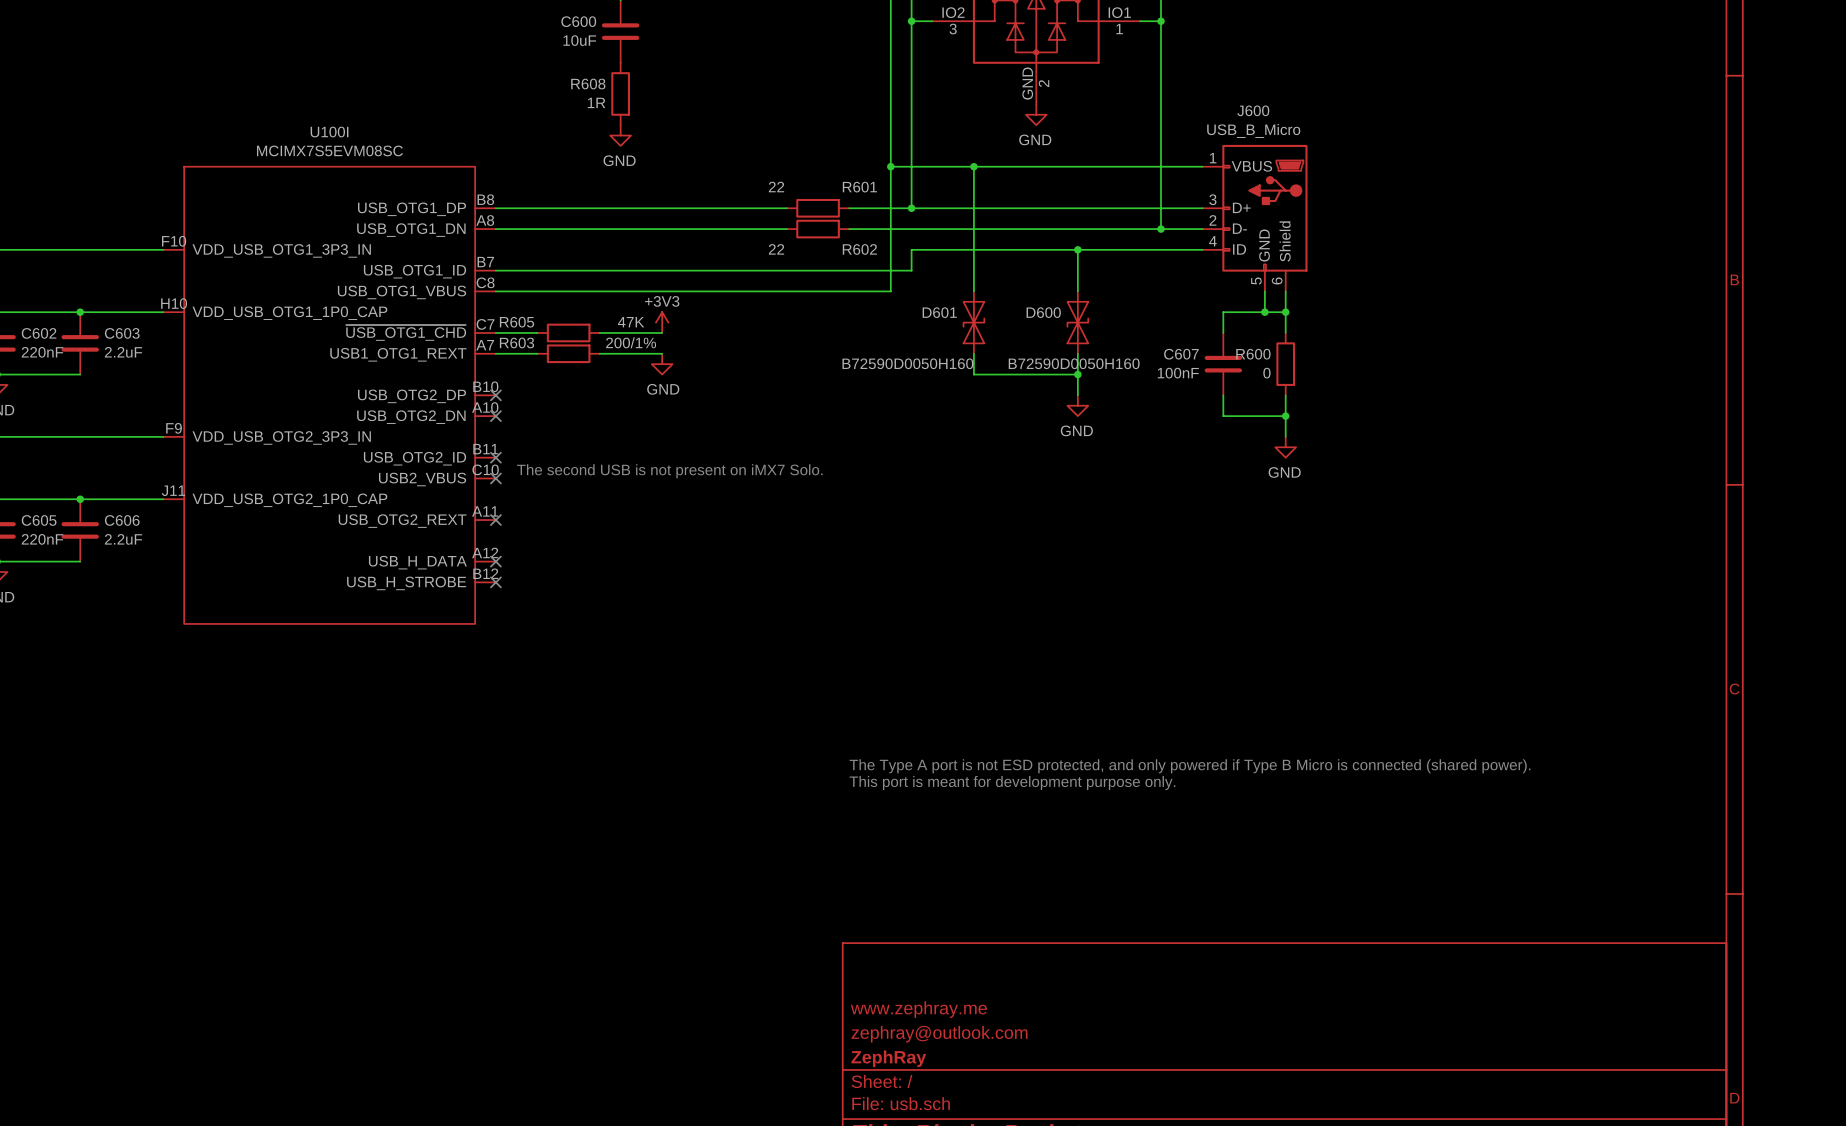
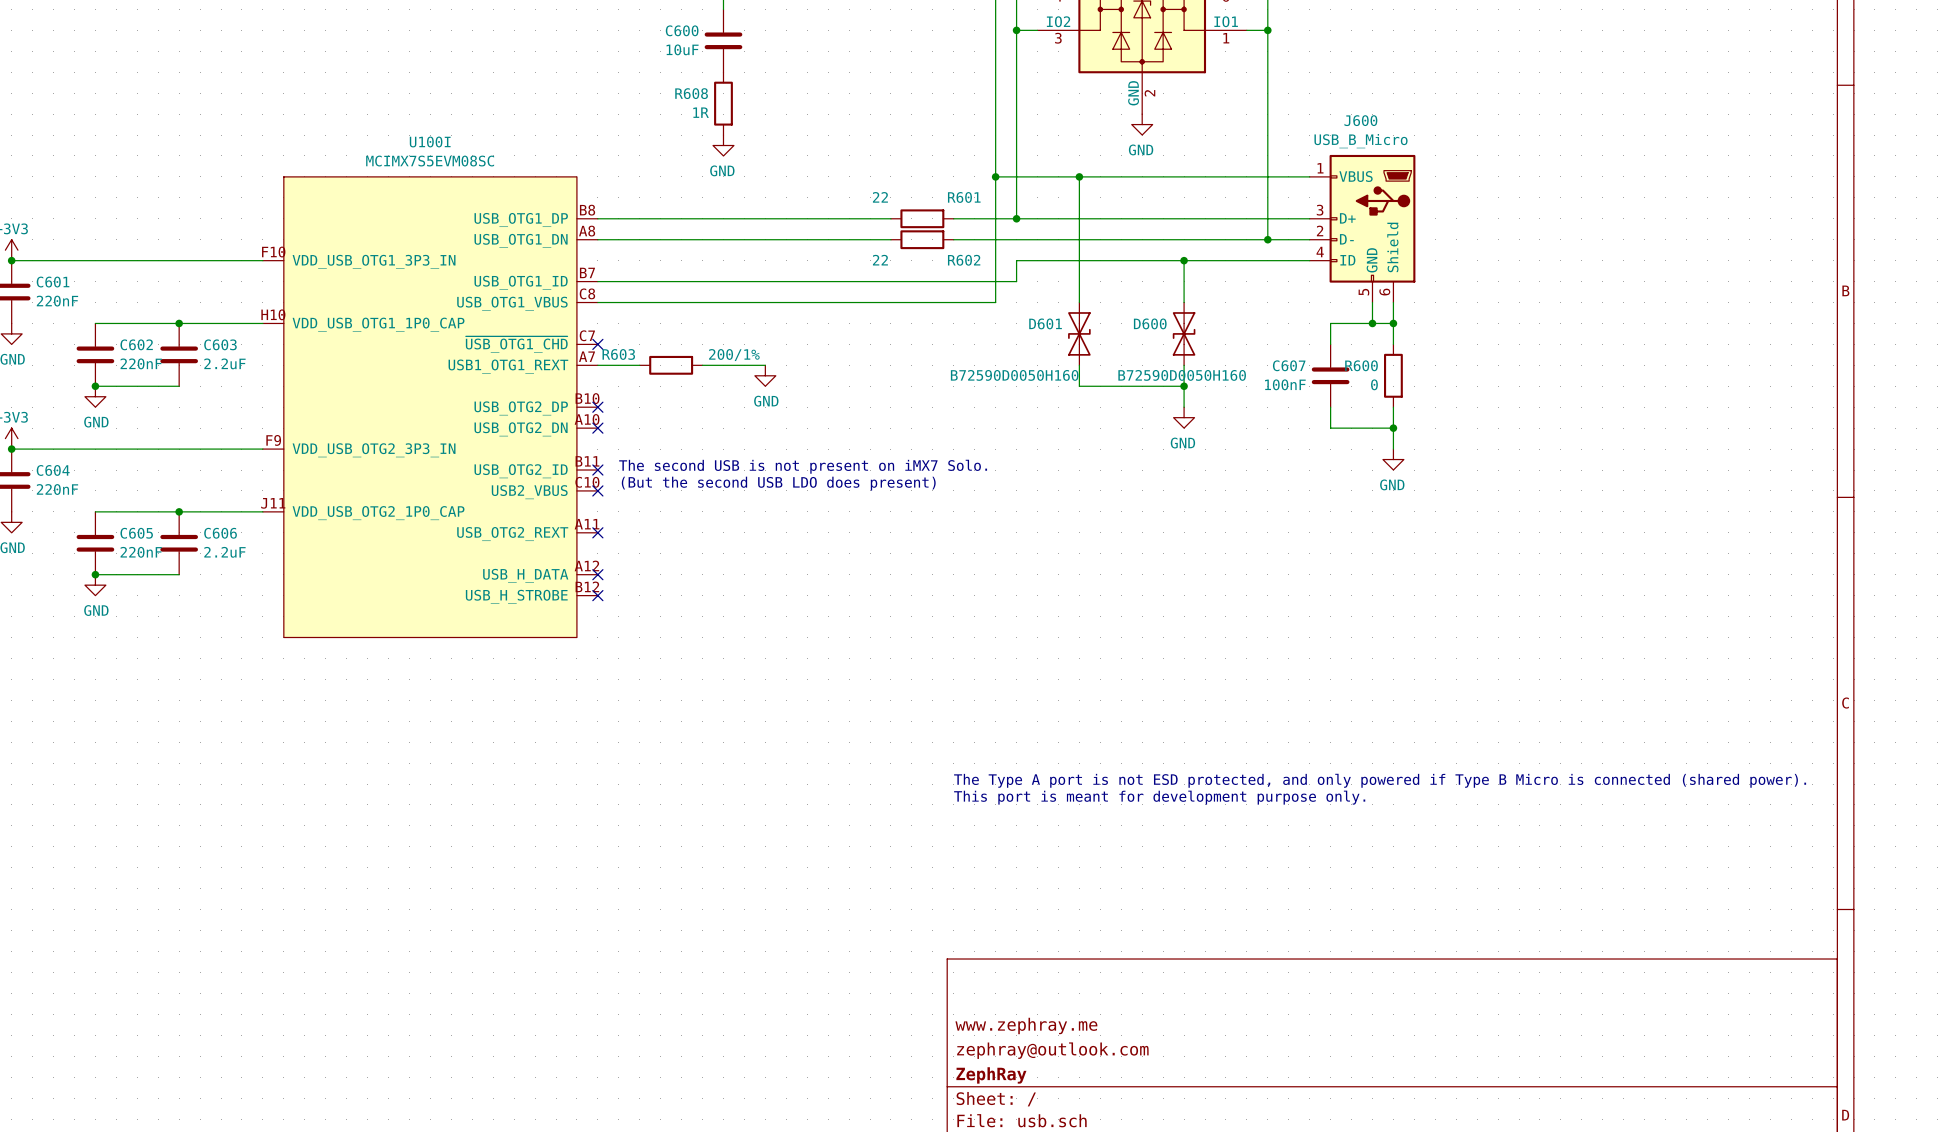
power symbol: +3V3 (662, 322) -> none
wire: (495, 332) (537, 332) -> none
no-connect mark: none -> (597, 344)
R605: 47K (568, 332) -> none
wire: (599, 332) (662, 332) -> none
text: none -> The second USB is not present on iMX7 Solo. (803, 466)
text: The second USB is not present on iMX7 Solo. (669, 471) -> (But the second USB LDO does present) (778, 483)

